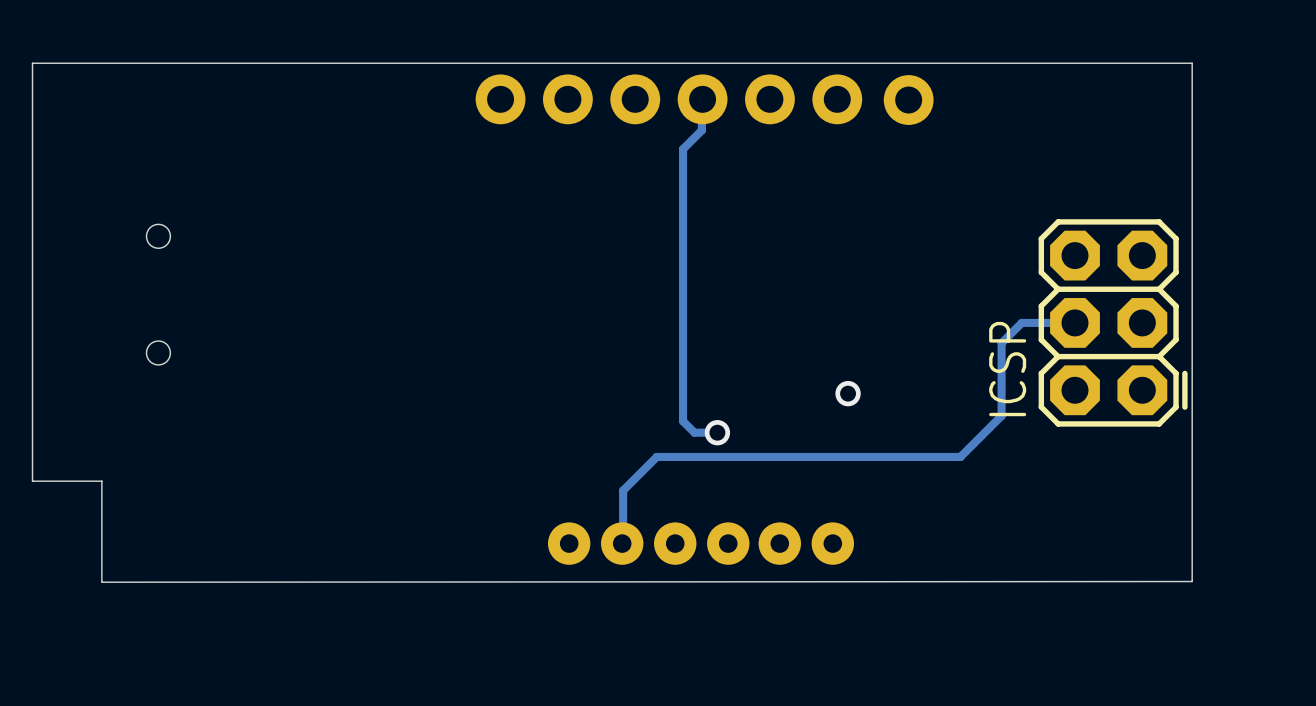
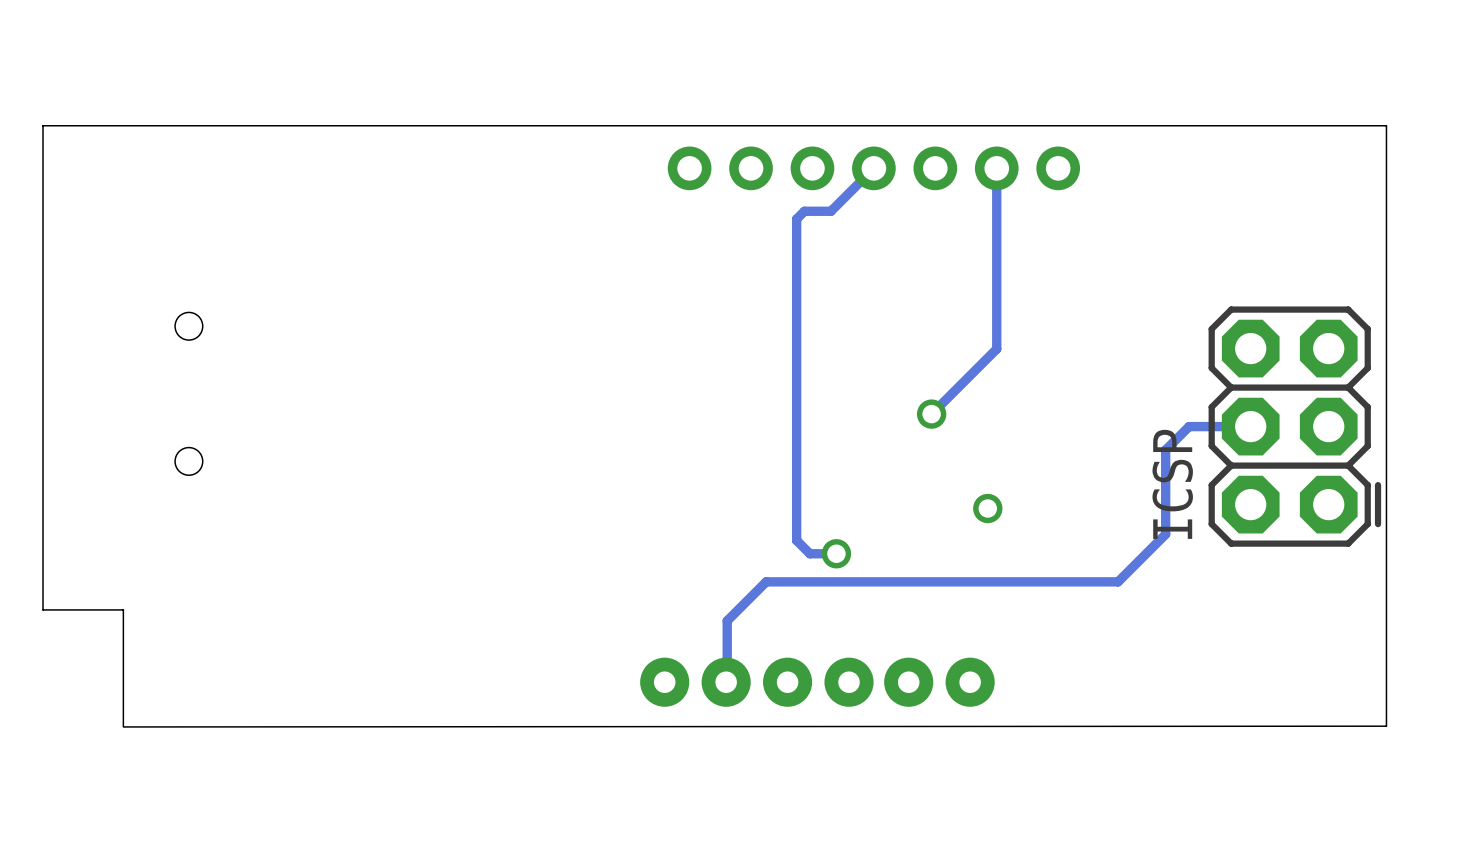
part: (668, 99) -> none
track: (702, 99) (701, 130) (683, 149) -> (873, 168) (830, 211) (804, 211) (796, 219) (796, 225)
part: none -> (873, 168)
track: none -> (996, 168) (996, 348) (931, 414)
part: (908, 100) -> none
via: none -> (931, 414)

